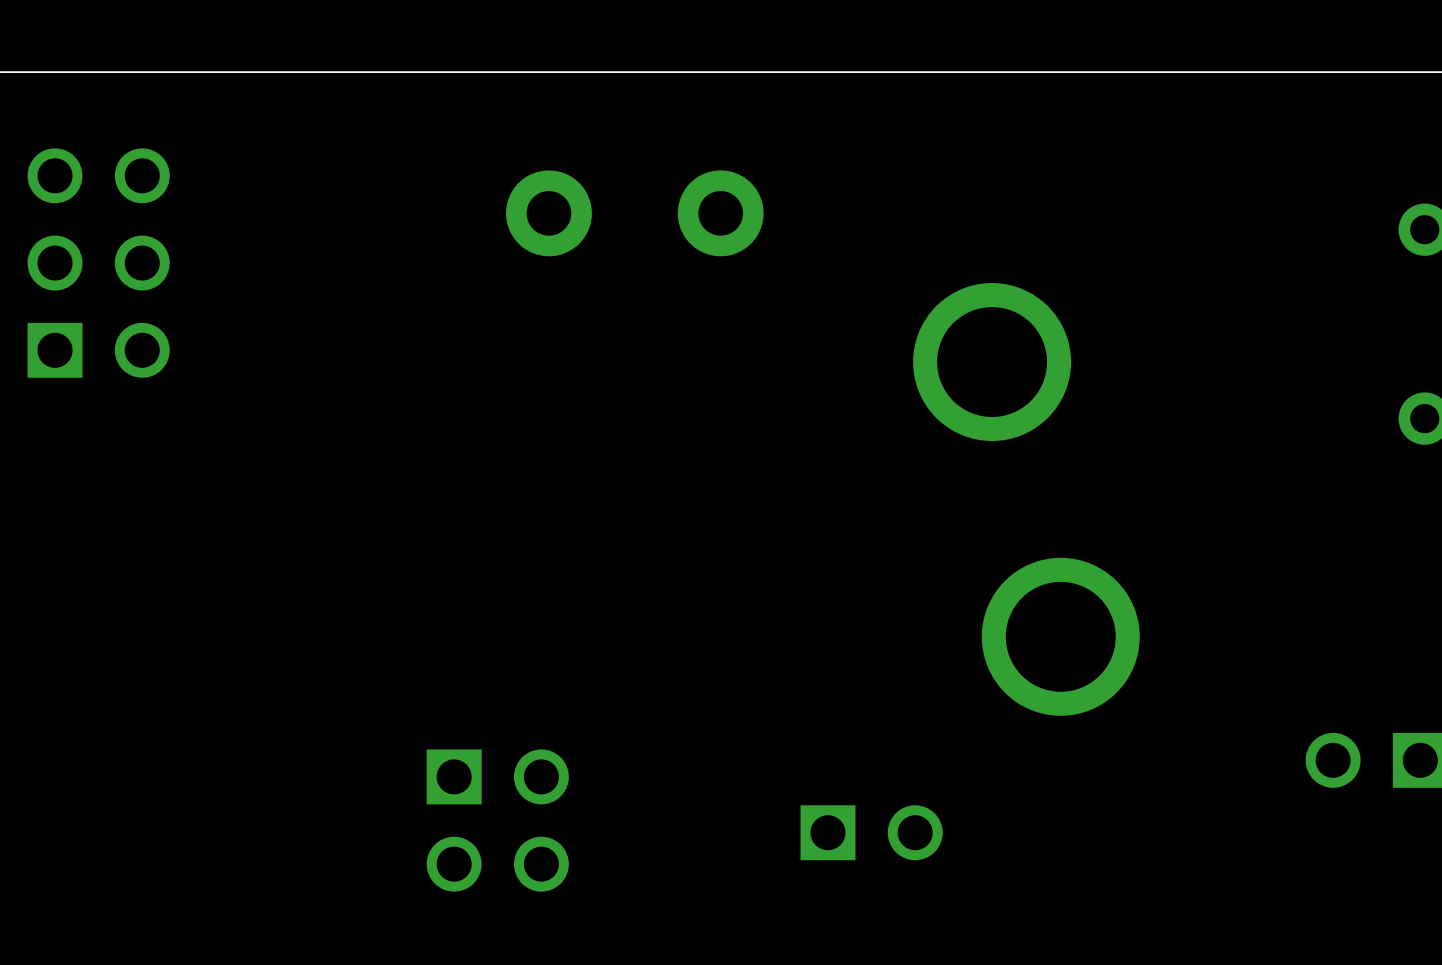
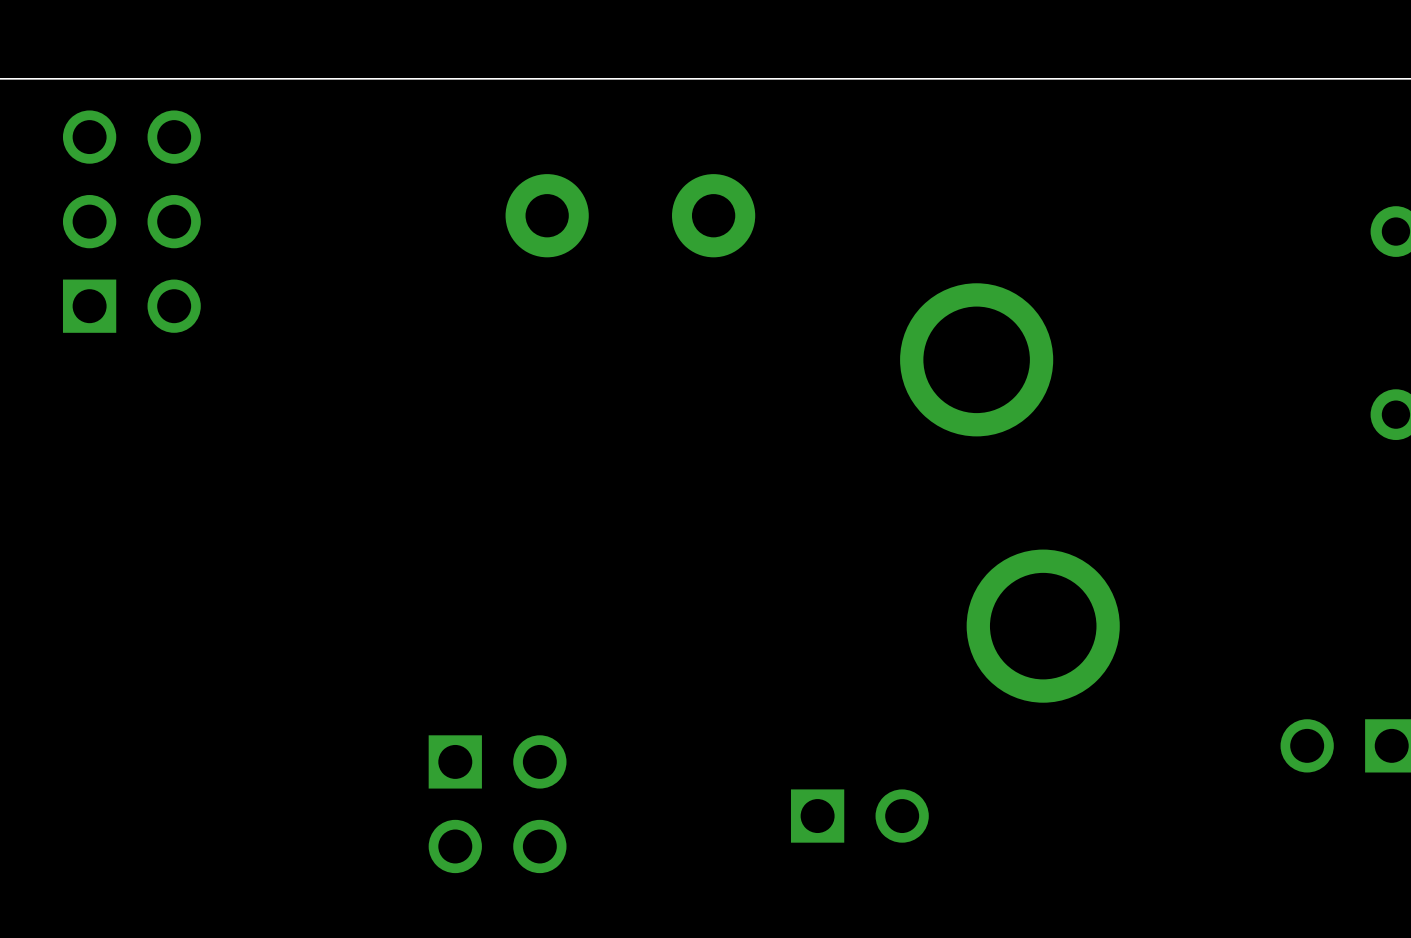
part position: (98, 263) -> (131, 221)

